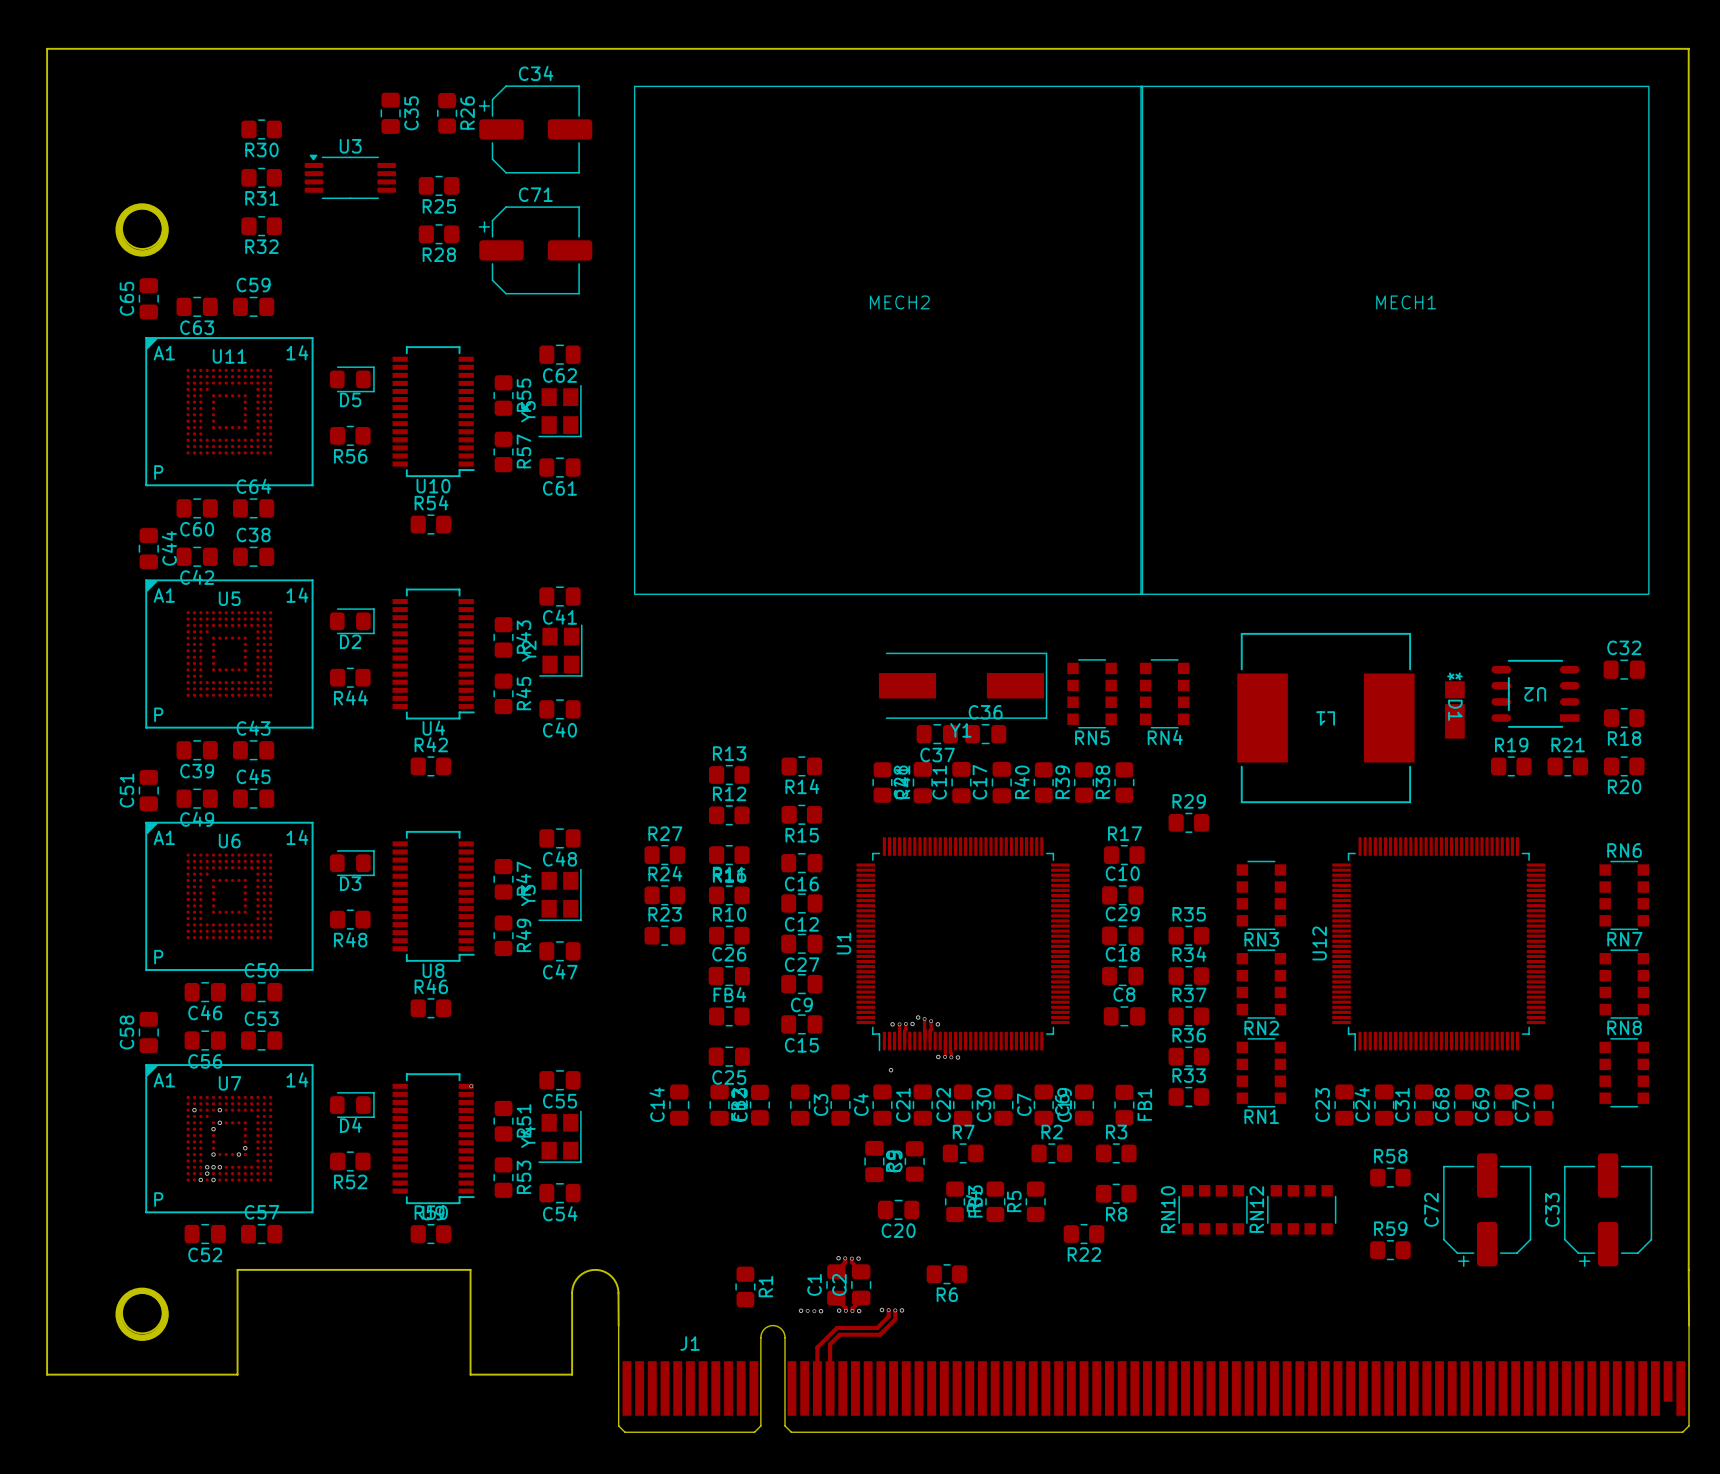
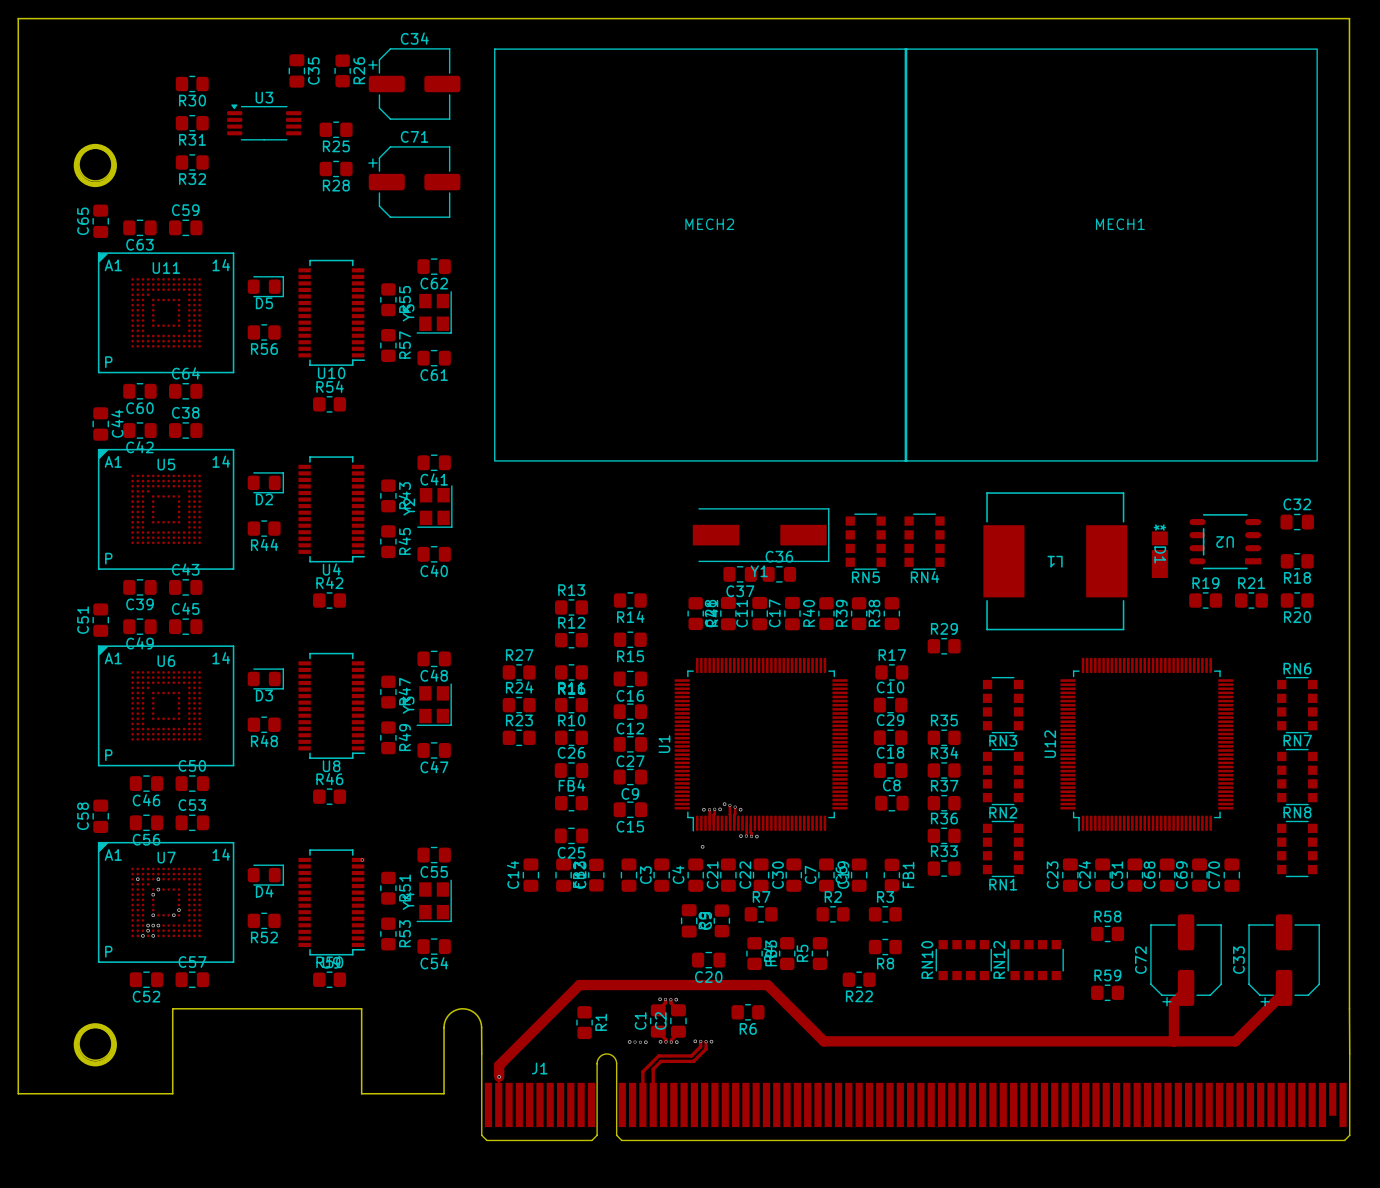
track: none -> (1284, 989) (1284, 992) (1235, 1041) (823, 1041) (767, 985) (579, 985) (499, 1065)
track: none -> (1186, 990) (1173, 1002) (1173, 1041)
track: none -> (499, 1065) (498, 1104)
via: none -> (499, 1076)

